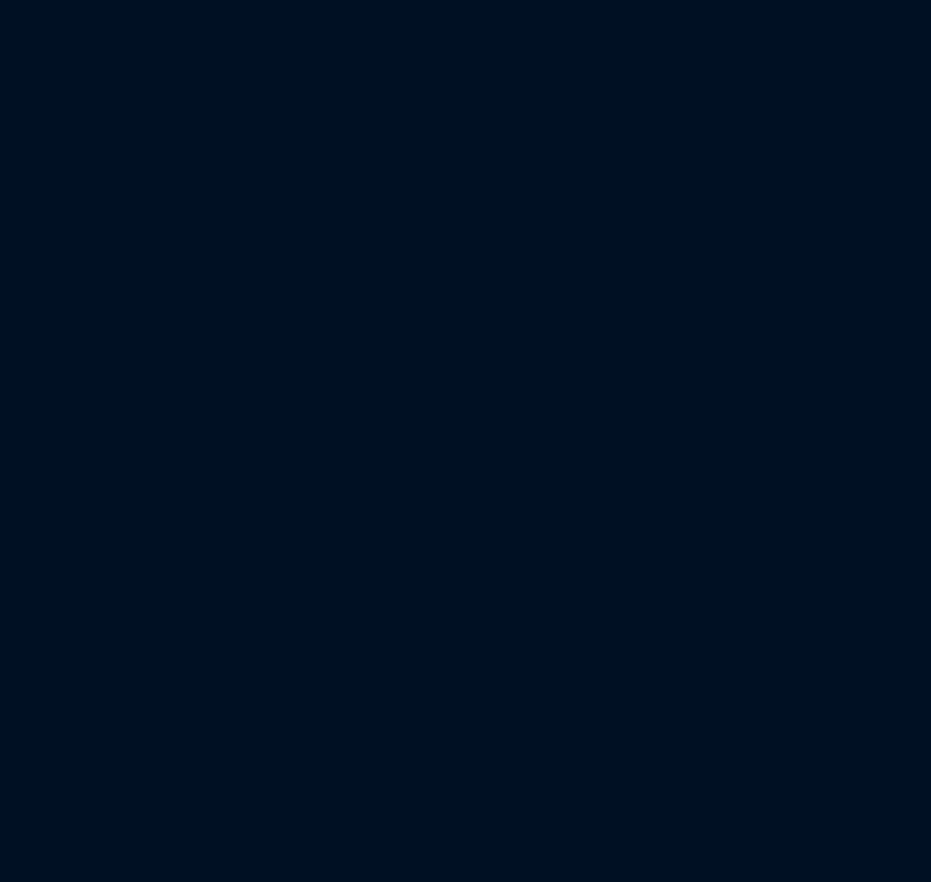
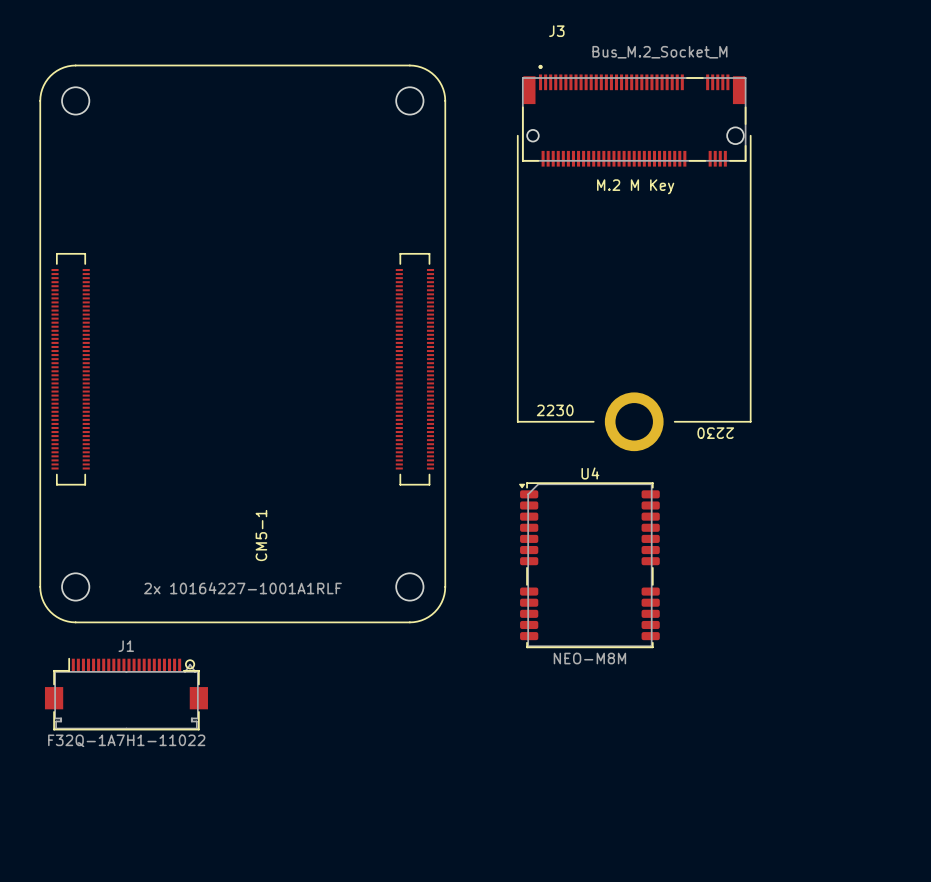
J3: none -> Bus_M.2_Socket_M (634, 258)
CM5-1: none -> 2x 10164227-1001A1RLF (242, 343)
U4: none -> NEO-M8M (589, 565)
J1: none -> F32Q-1A7H1-11022 (126, 694)

